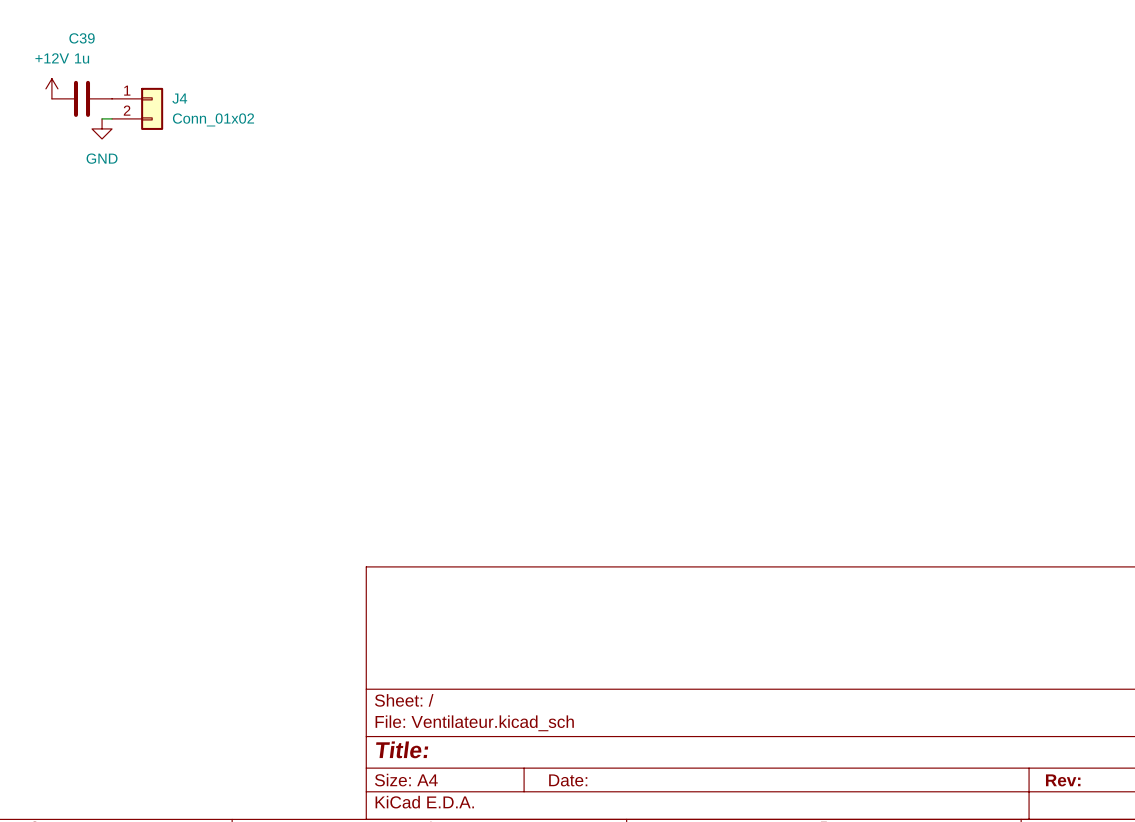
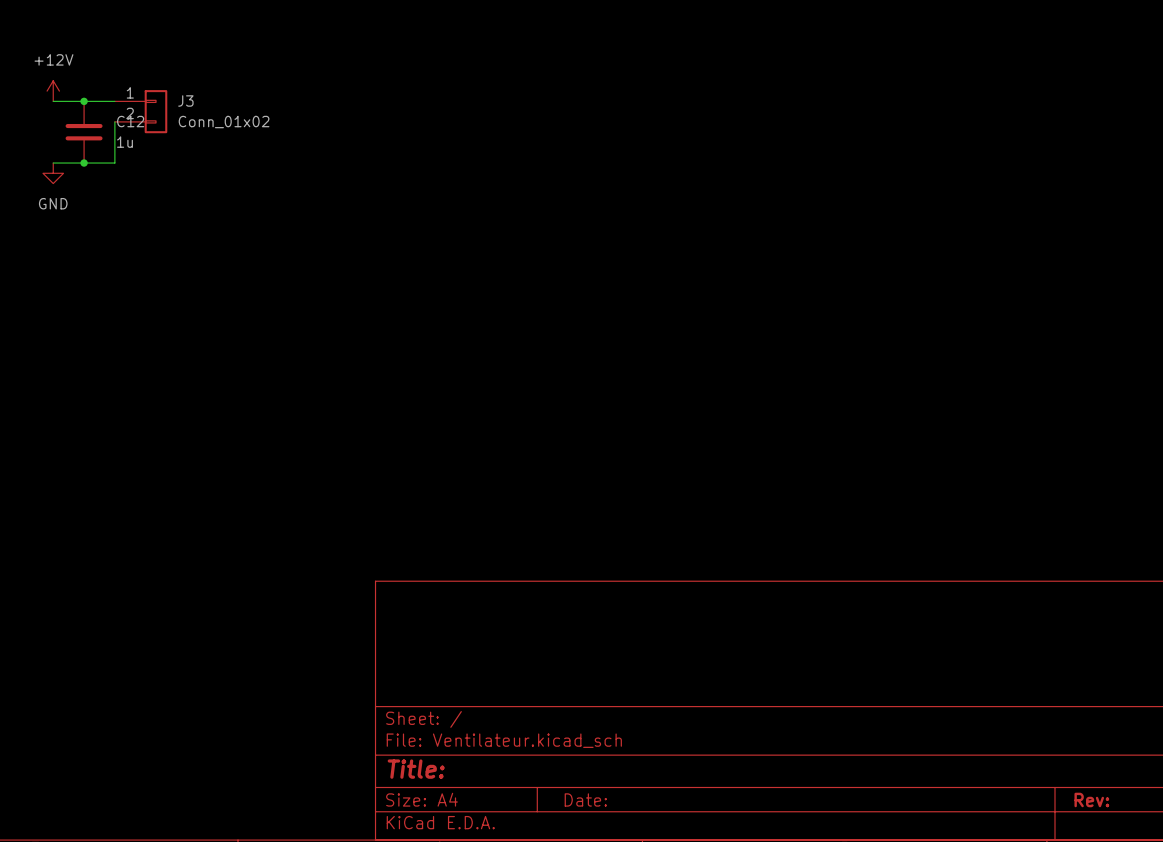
C39: 1u (82, 98) -> none
junction: none -> (84, 101)
J4 name: J4 (179, 98) -> J3 (185, 100)
wire: (102, 118) (112, 118) -> (53, 163) (114, 163) (114, 121)
C12: none -> 1u (84, 132)
power symbol position: GND (102, 128) -> GND (53, 173)
junction: none -> (84, 163)

